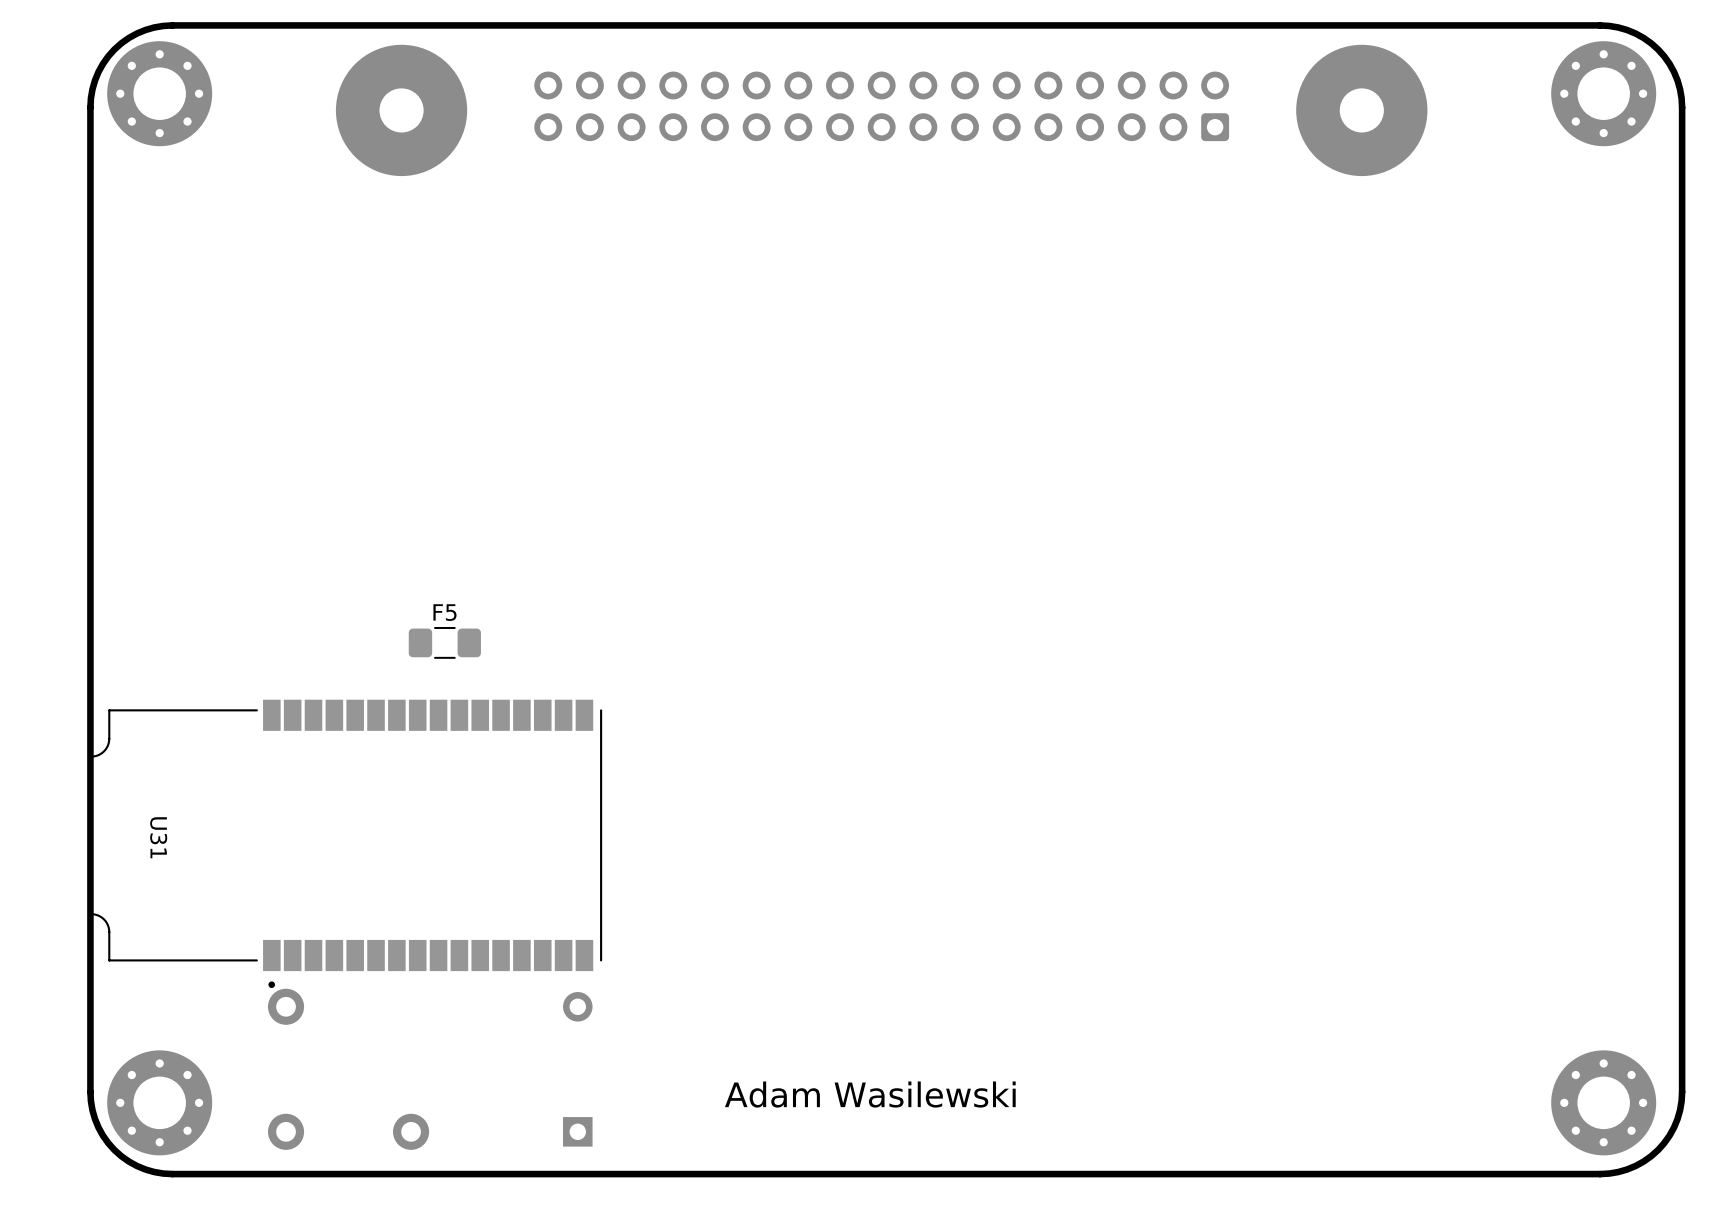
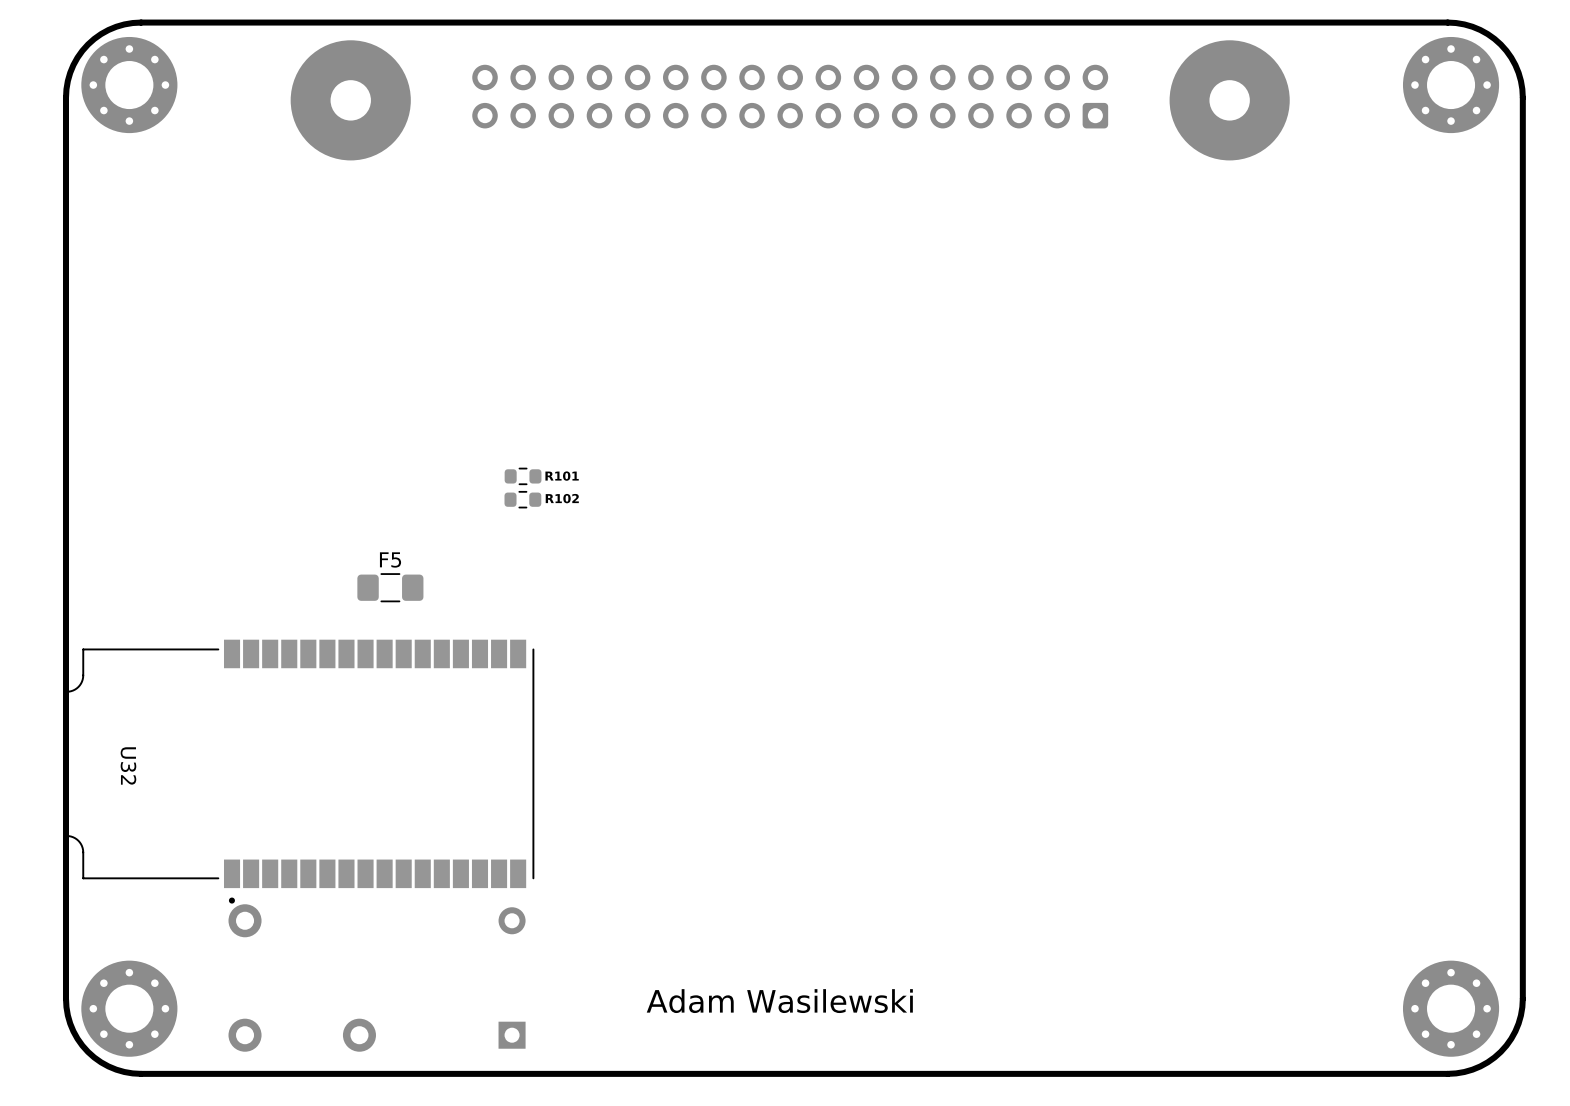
R101: none -> (523, 476)
R102: none -> (522, 499)
U31 name: U31 (158, 837) -> U32 (128, 765)

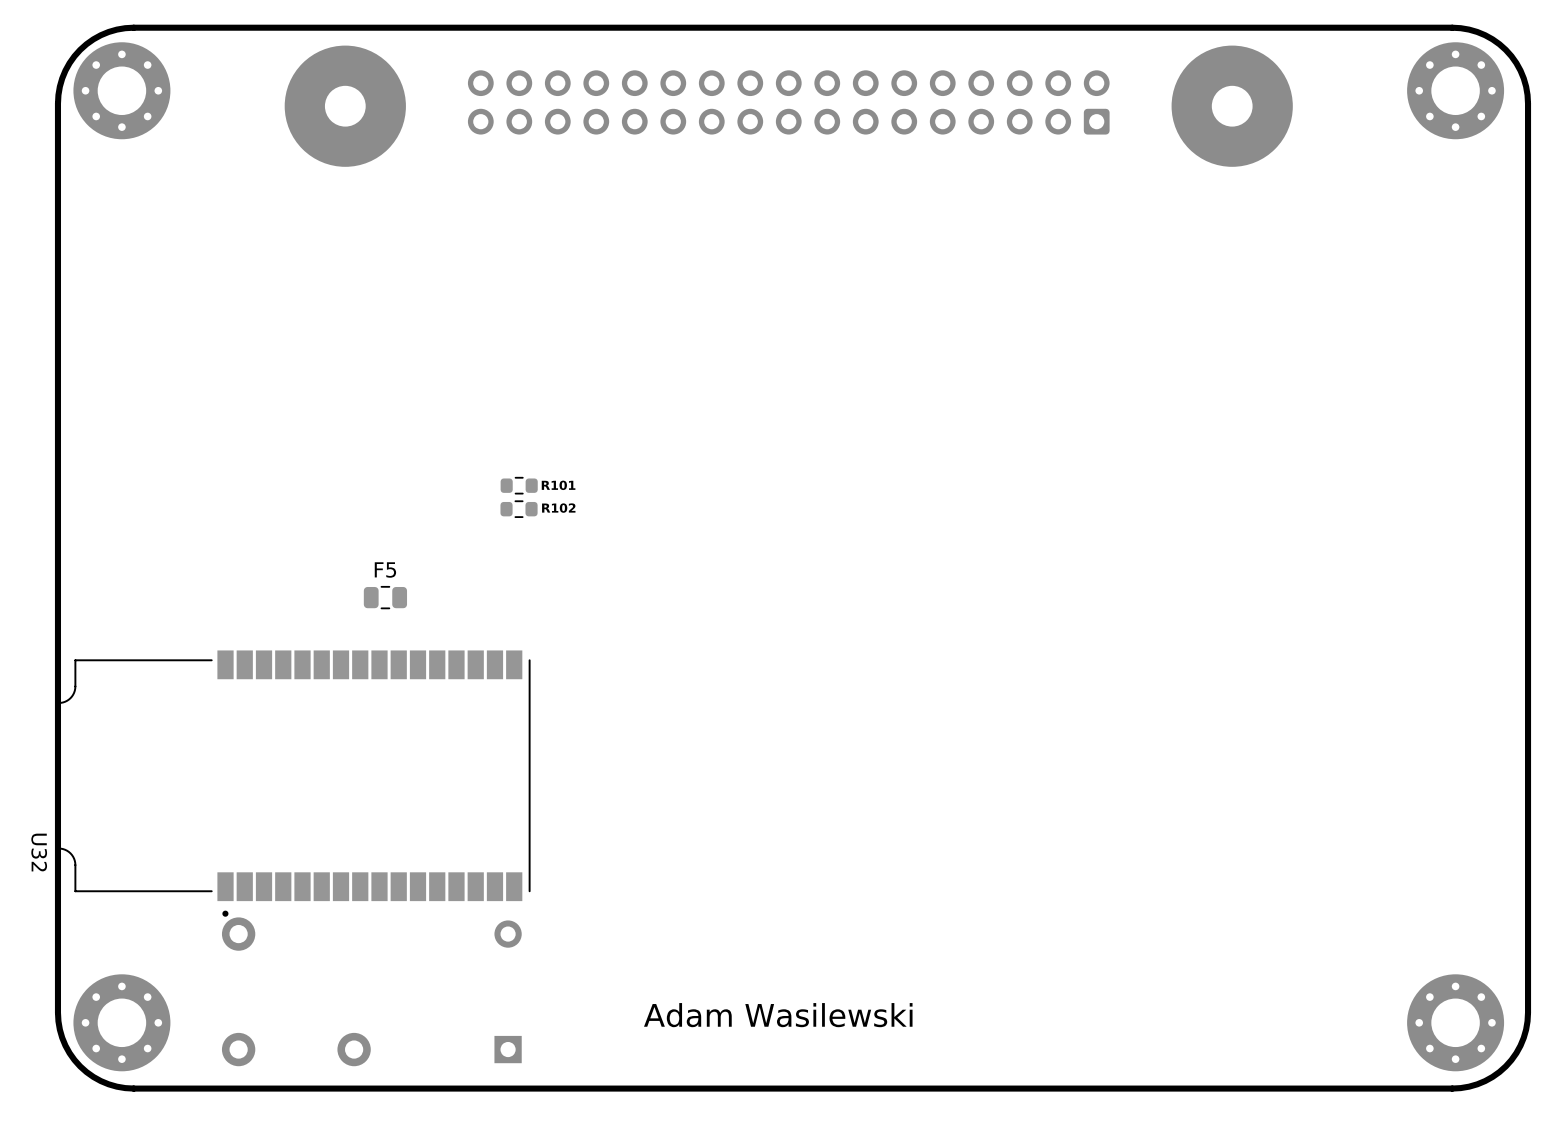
F5 footprint: [357, 573, 424, 603] -> [363, 585, 408, 610]
U32 name position: U32 (128, 765) -> U32 (39, 852)

